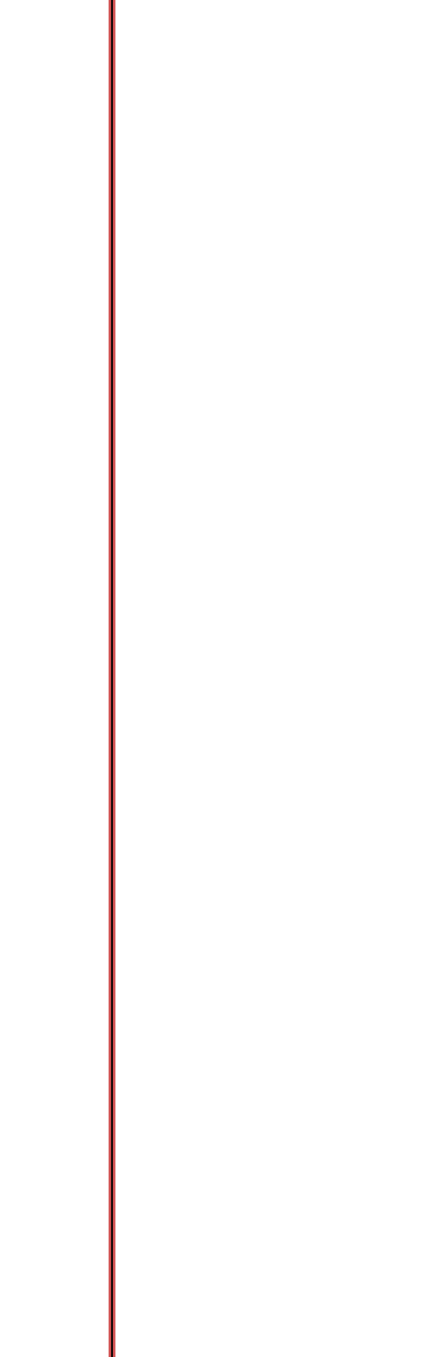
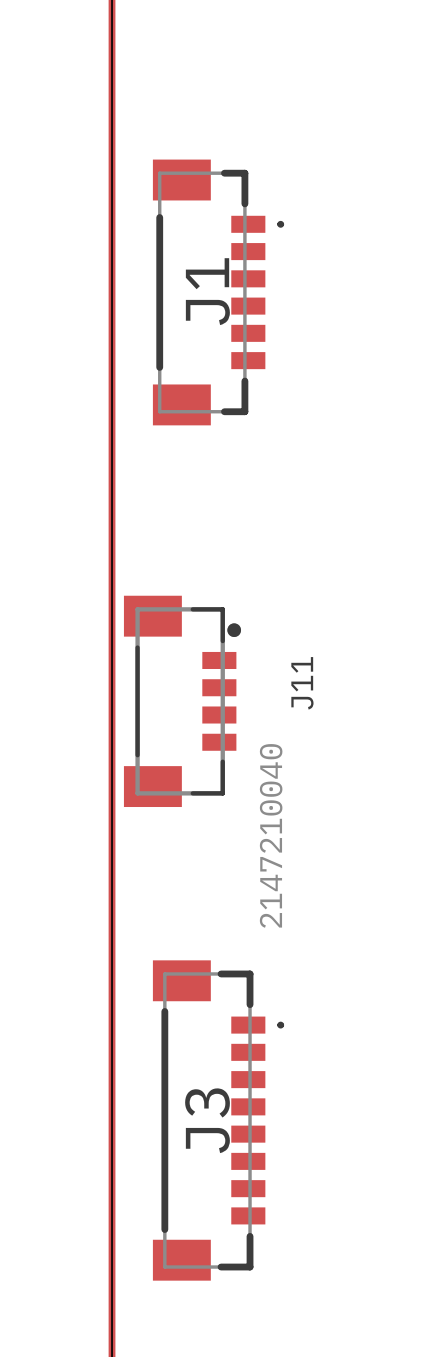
J1: none -> (218, 292)
J11: none -> 2147210040 (182, 701)
J3: none -> (218, 1120)

